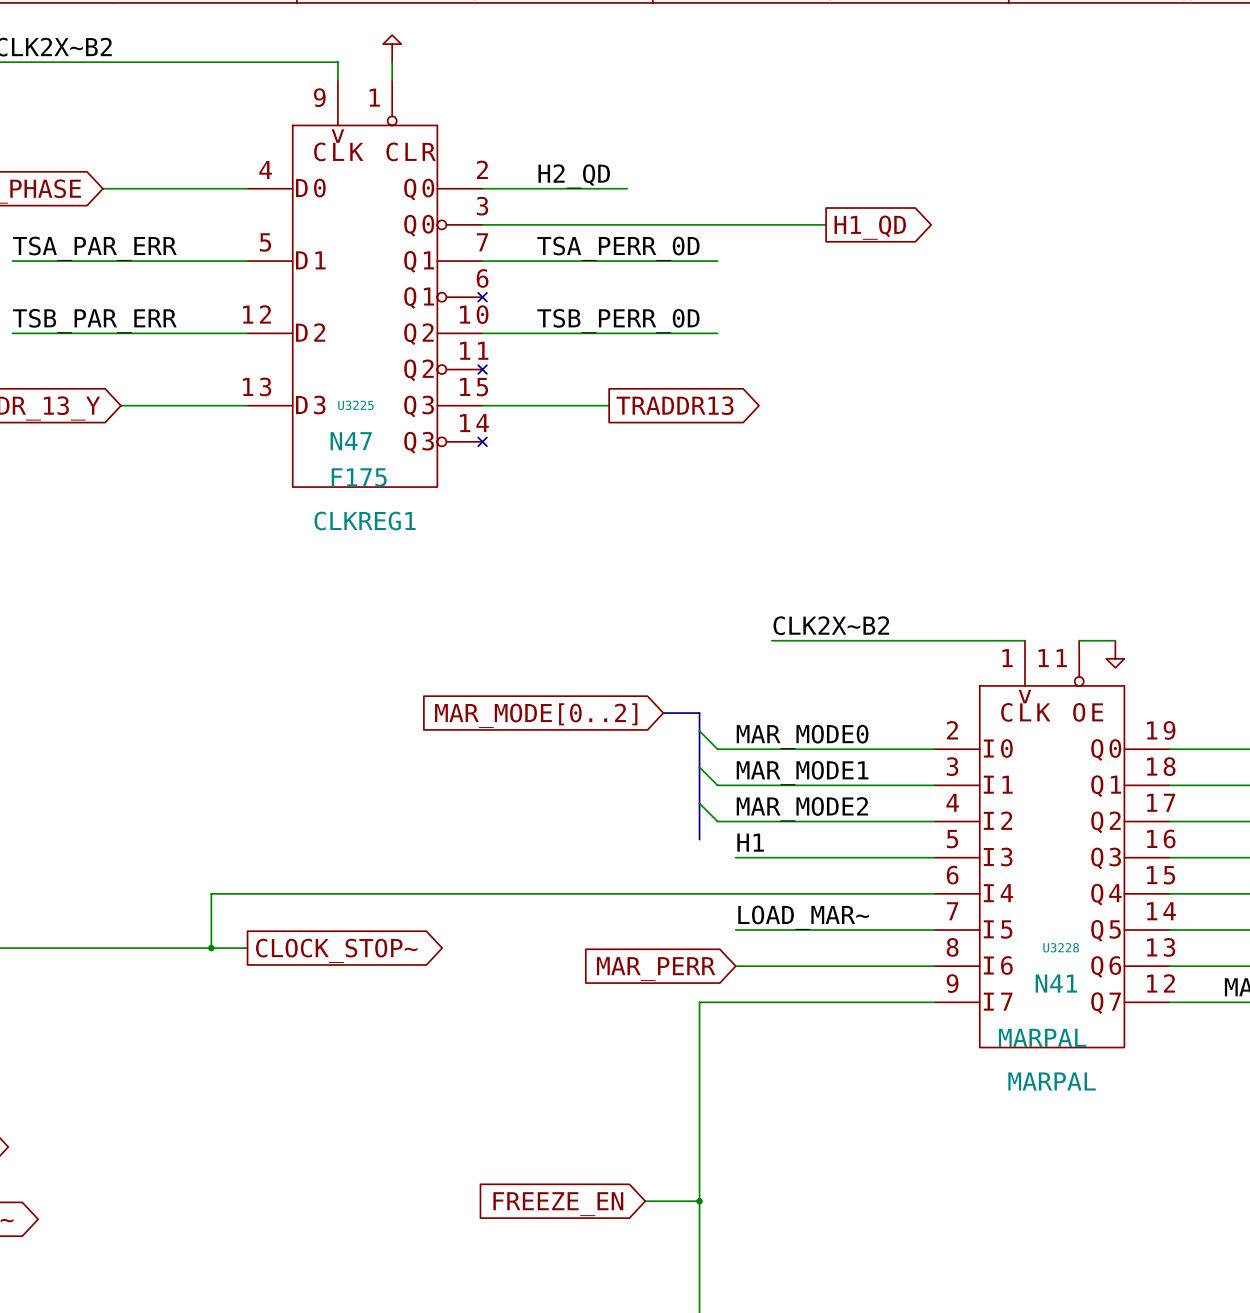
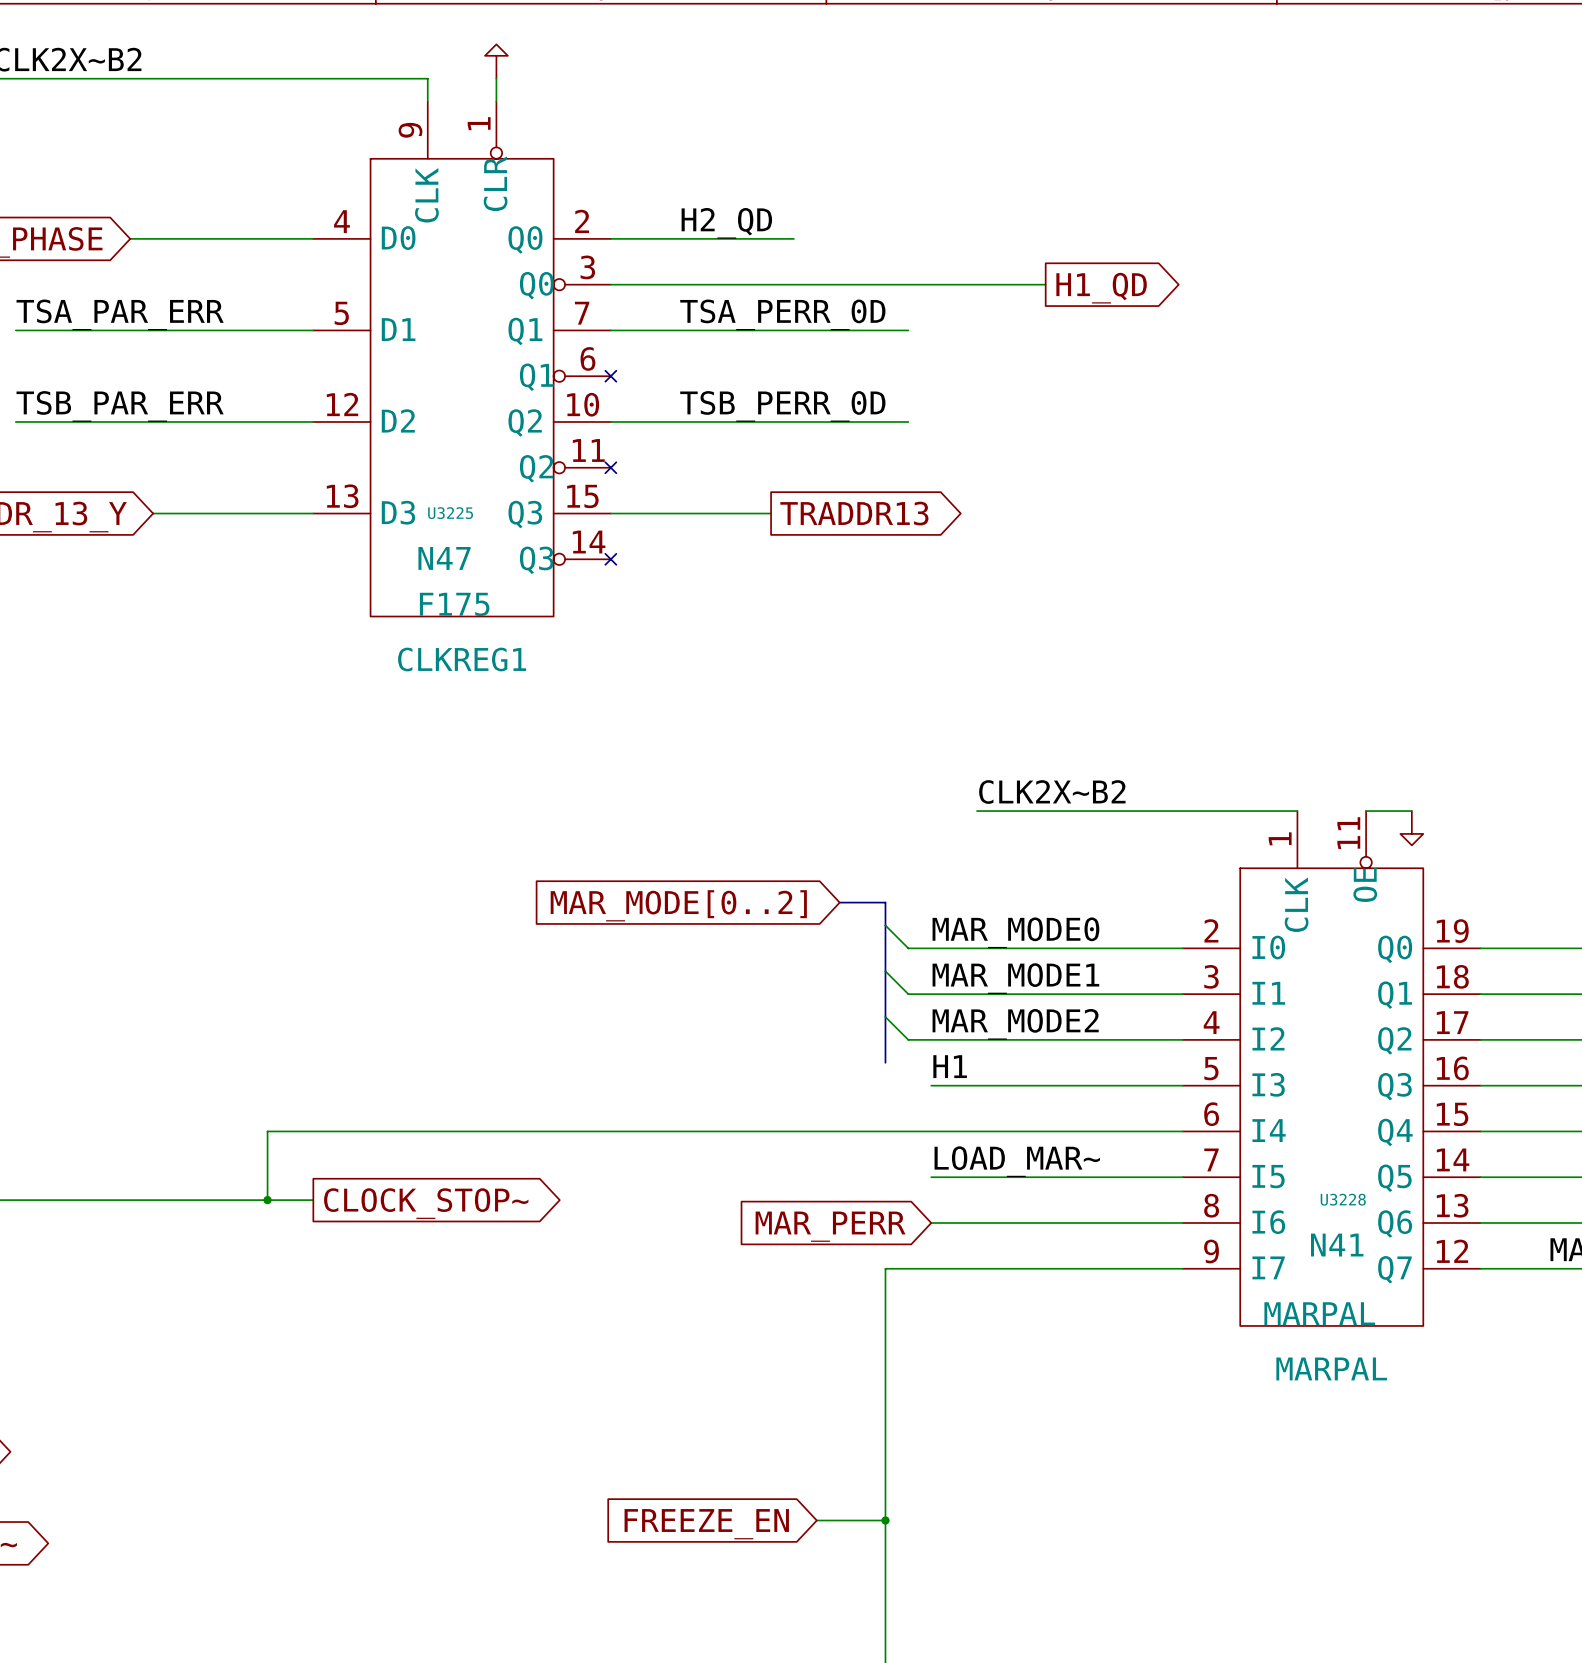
U3225 symbol: [247, 80, 483, 488] -> [313, 101, 611, 617]
U3228 symbol: [934, 640, 1170, 1048] -> [1182, 811, 1481, 1326]

